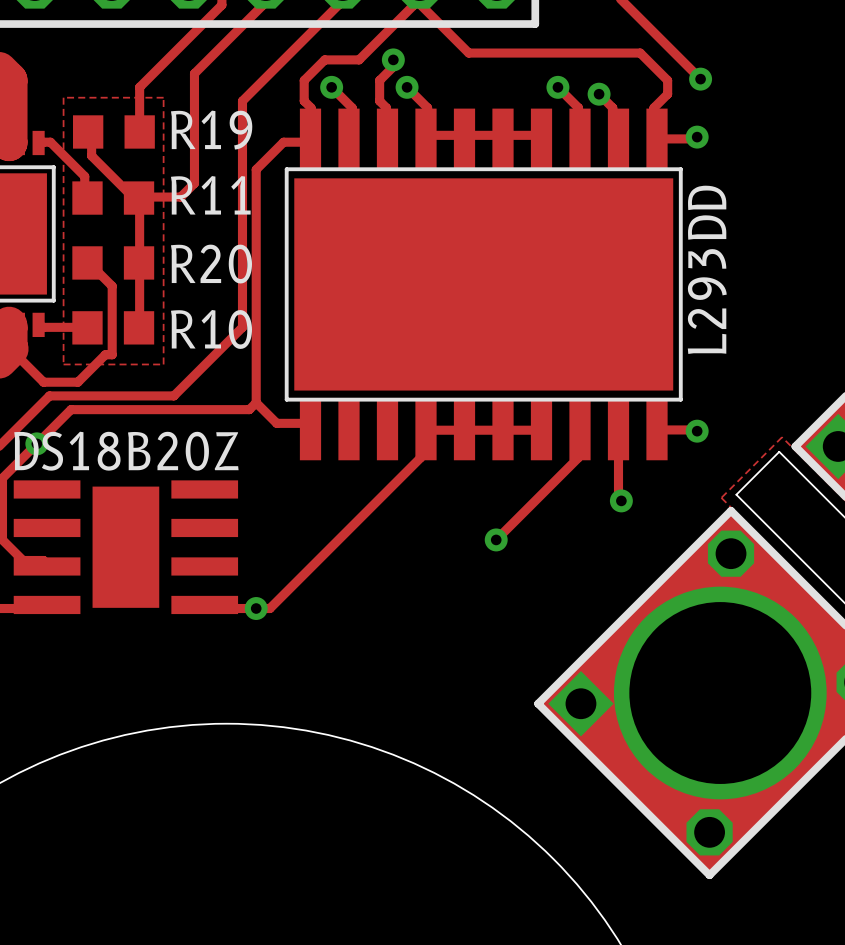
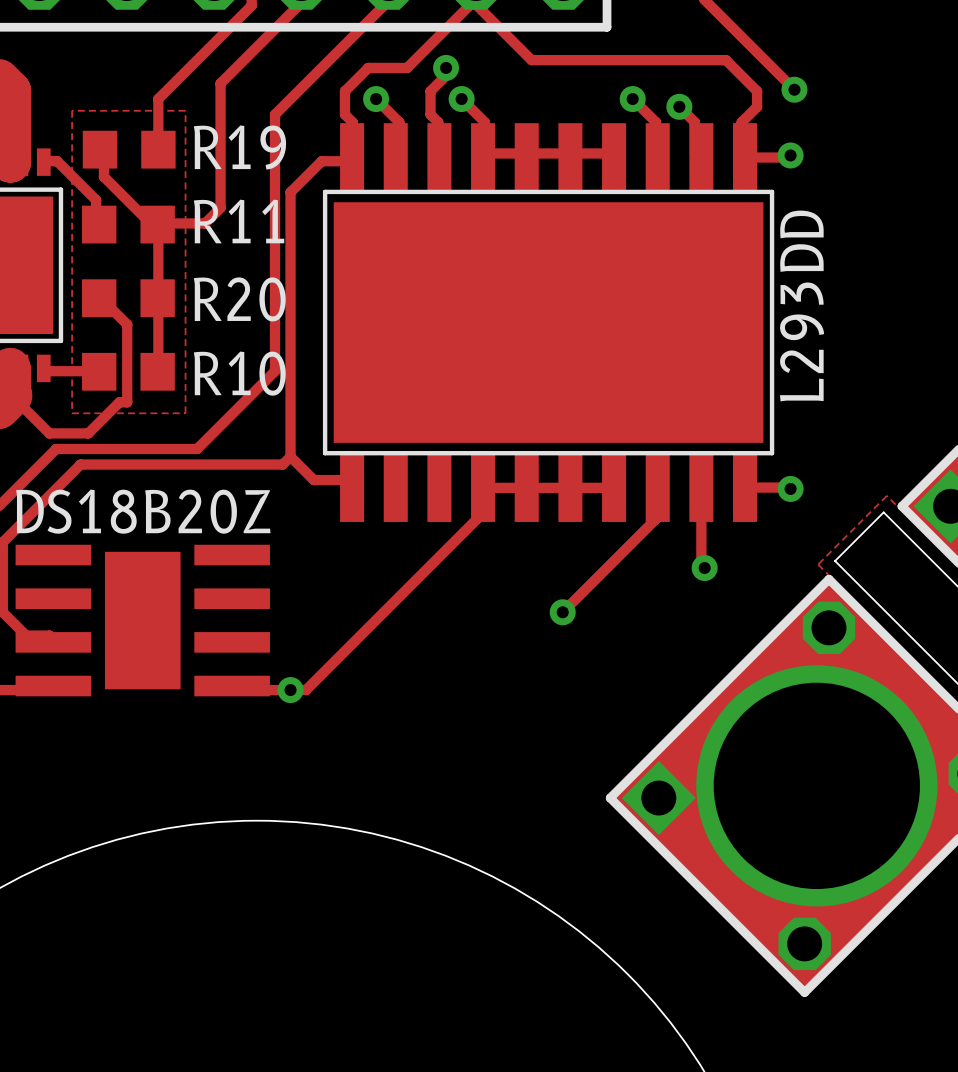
via: (36, 443) -> none

